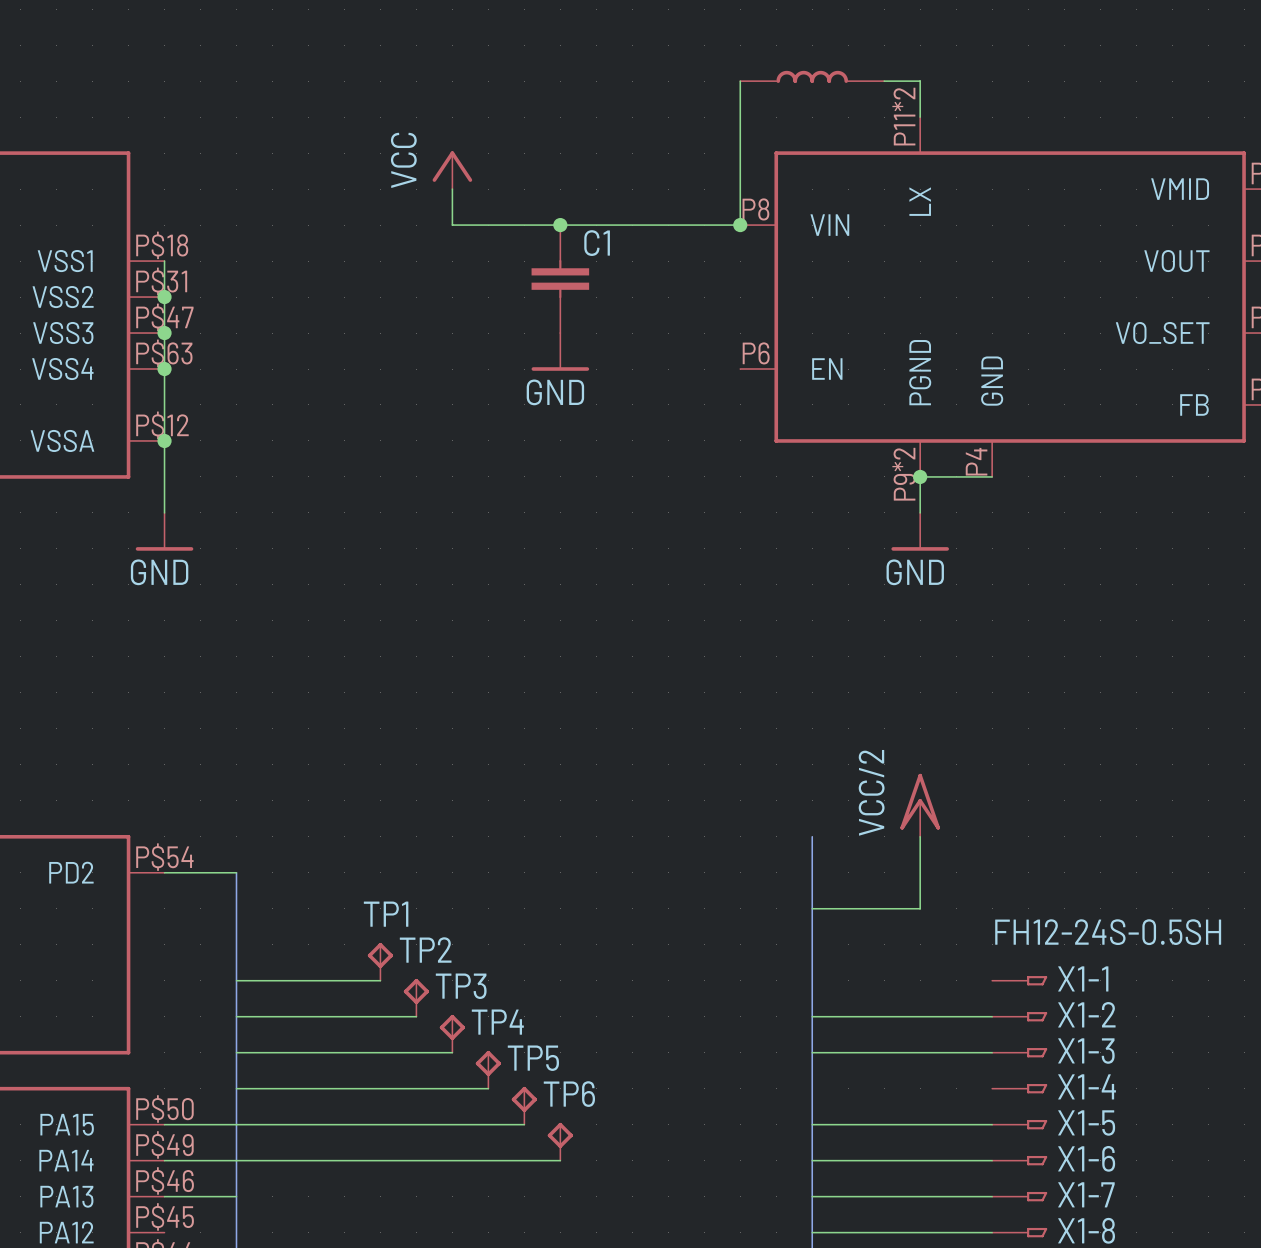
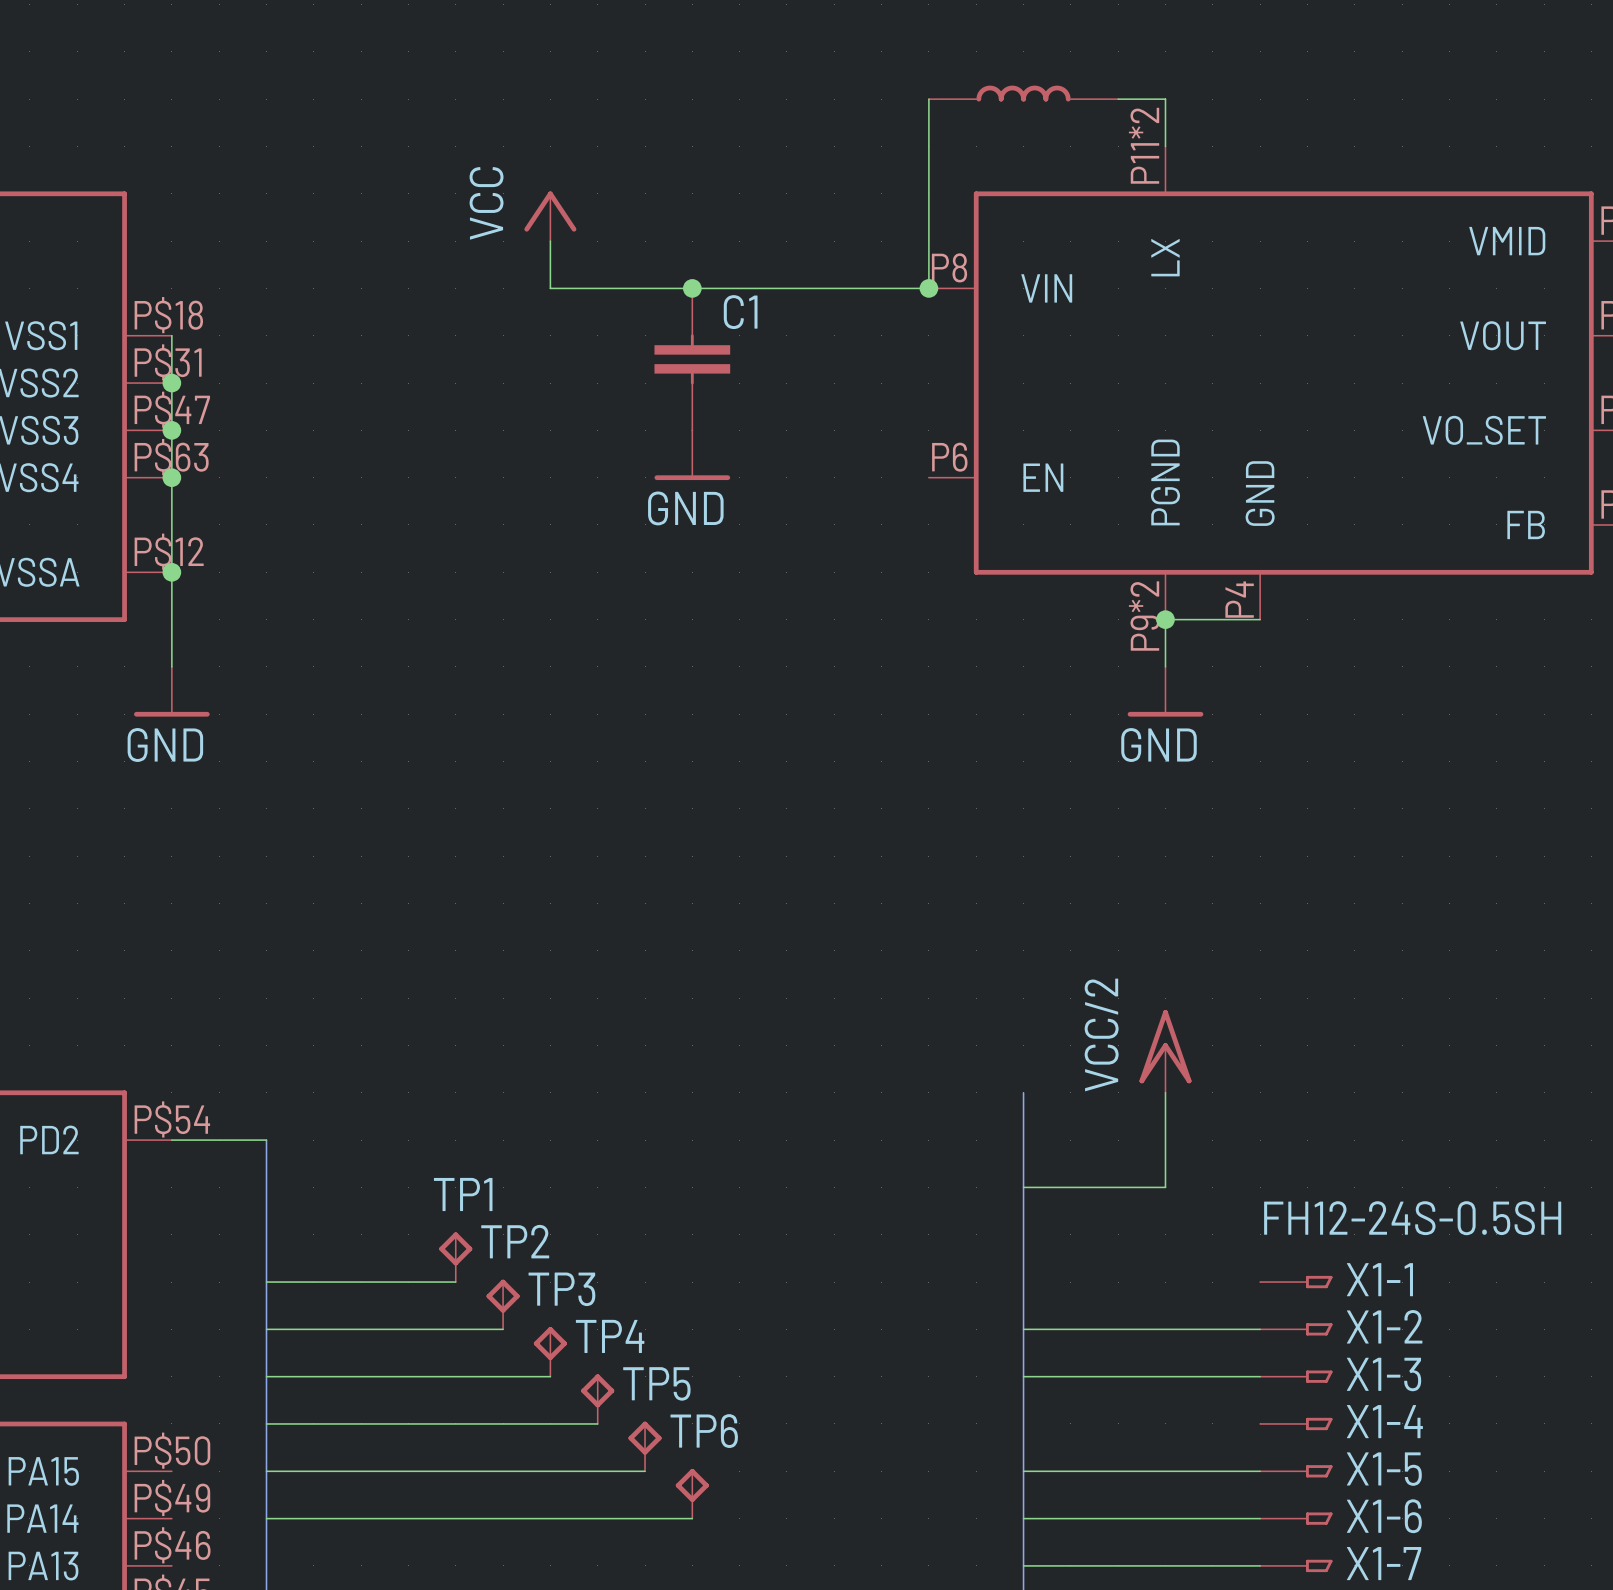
wire: (164, 1124) (236, 1124) -> none
wire: (164, 1160) (236, 1160) -> none
wire: (164, 1196) (236, 1196) -> none

